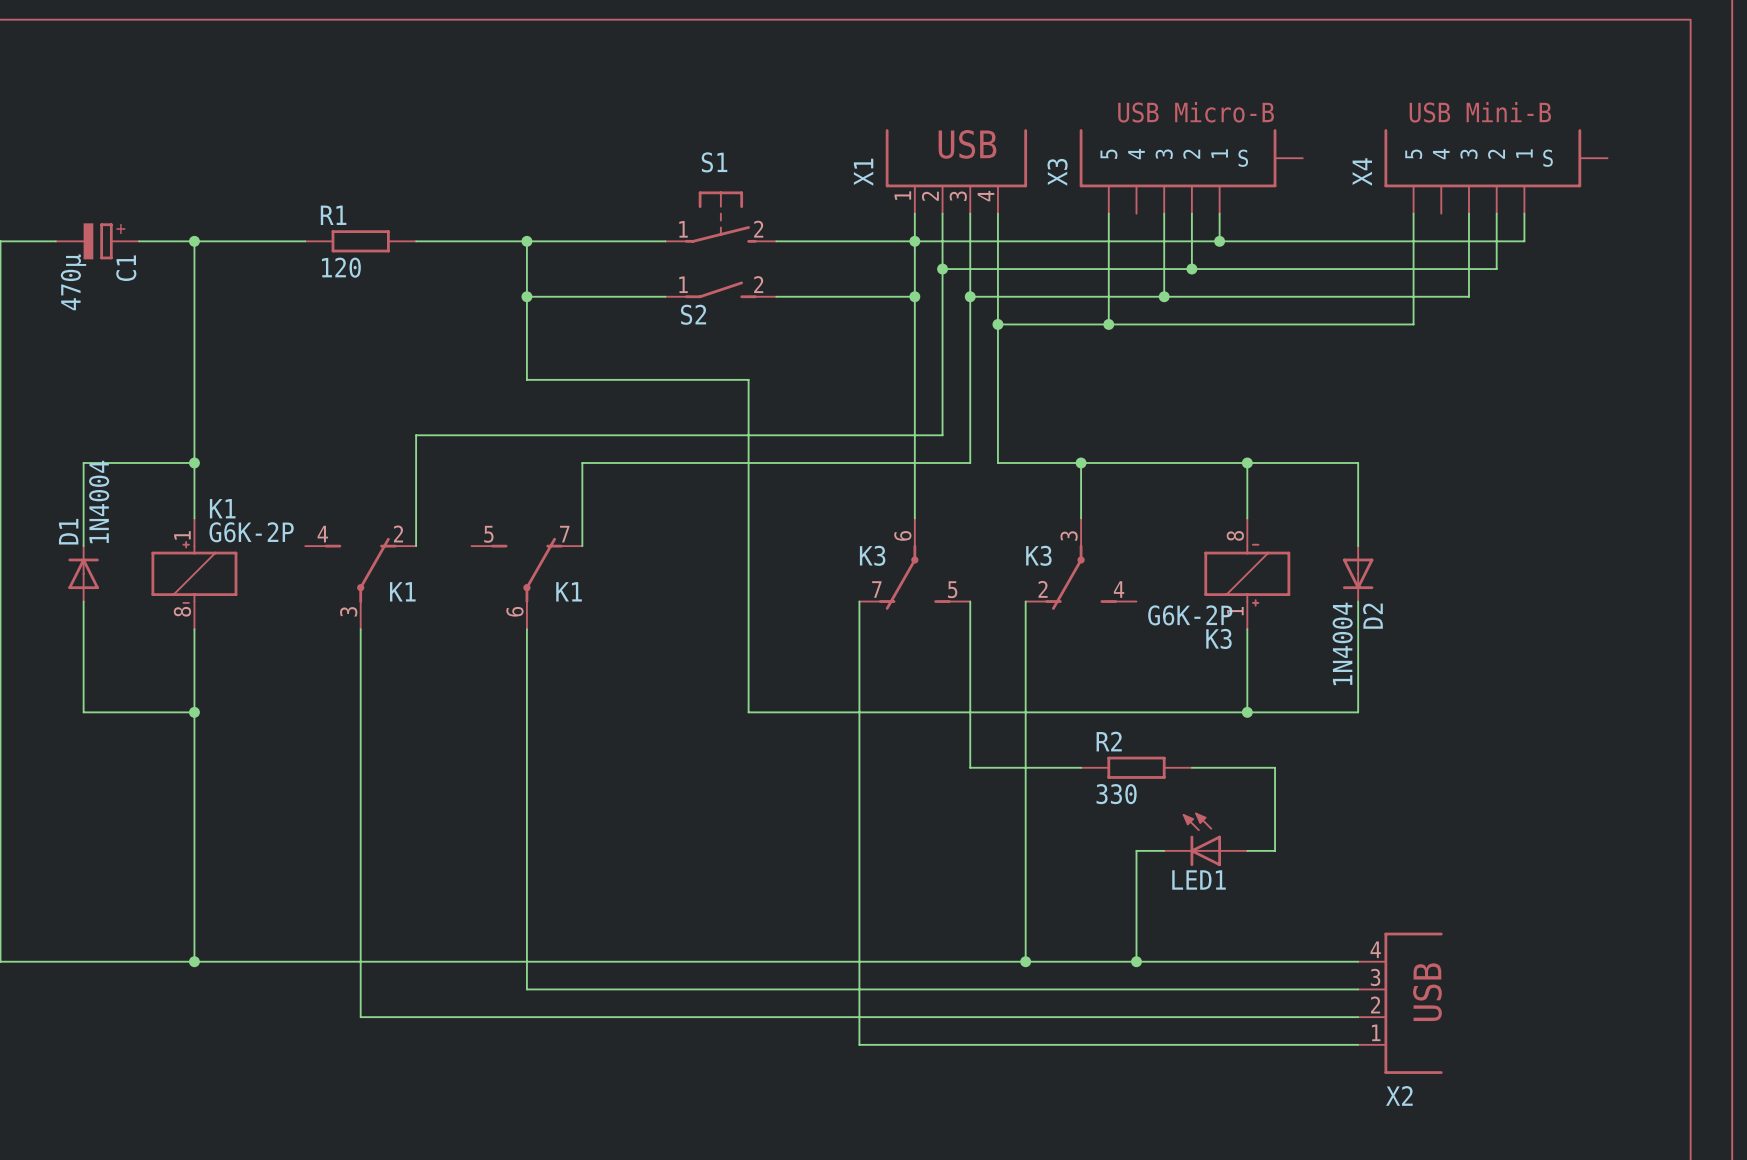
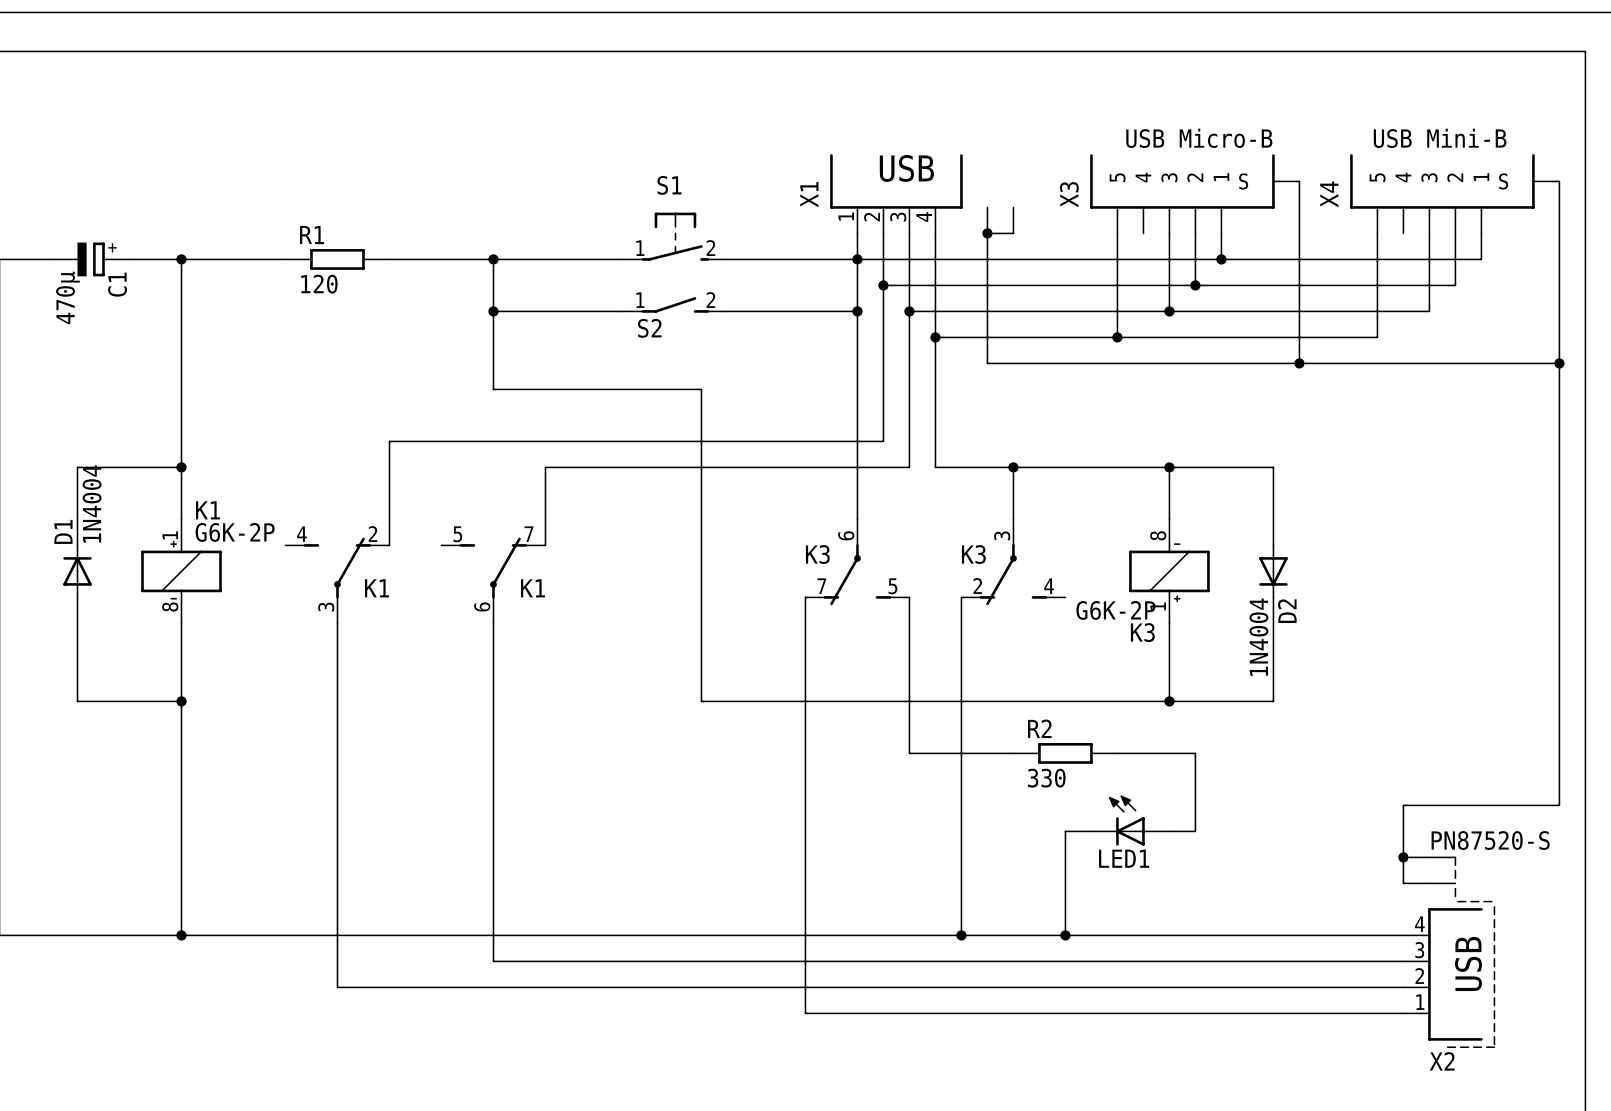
wire: none -> (1299, 181) (1299, 363)
wire: none -> (1559, 181) (1559, 805) (1403, 805) (1403, 883) (1429, 883)
X3 position: (1191, 171) -> (1194, 193)
X4 position: (1496, 171) -> (1454, 193)
wire: none -> (987, 207) (987, 363) (1559, 363)
wire: none -> (1013, 207) (1013, 233) (987, 233)
junction: none -> (987, 233)
wire: (1108, 213) (1108, 324) -> none
wire: (1164, 213) (1164, 296) -> (1169, 233) (1169, 311)
wire: (1219, 213) (1219, 241) -> (1221, 233) (1221, 259)
wire: none -> (1195, 233) (1195, 285)
wire: (1413, 213) (1413, 324) -> (1481, 233) (1481, 259) (1429, 259) (1429, 311) (1377, 311) (1377, 337) (1325, 337)
wire: (1496, 213) (1496, 269) -> (1455, 233) (1455, 285) (1403, 285)
junction: (1219, 241) -> none
junction: none -> (1221, 259)
wire: none -> (1117, 285) (1117, 337)
junction: (1191, 269) -> none
junction: none -> (1195, 285)
junction: (1164, 296) -> none
junction: none -> (1169, 311)
junction: (1108, 324) -> none
junction: none -> (1117, 337)
junction: none -> (1299, 363)
junction: none -> (1559, 363)
X2 value: none -> PN87520-S (1490, 840)
wire: none -> (1403, 857) (1429, 857)
junction: none -> (1403, 857)
X2 symbol: [1358, 932, 1443, 1074] -> [1403, 856, 1496, 1048]
wire: none -> (1273, 935) (1403, 935)
wire: none -> (1273, 961) (1403, 961)
wire: none -> (1273, 987) (1403, 987)
wire: none -> (1273, 1013) (1403, 1013)
X2 name position: X2 (1399, 1095) -> X2 (1442, 1061)

